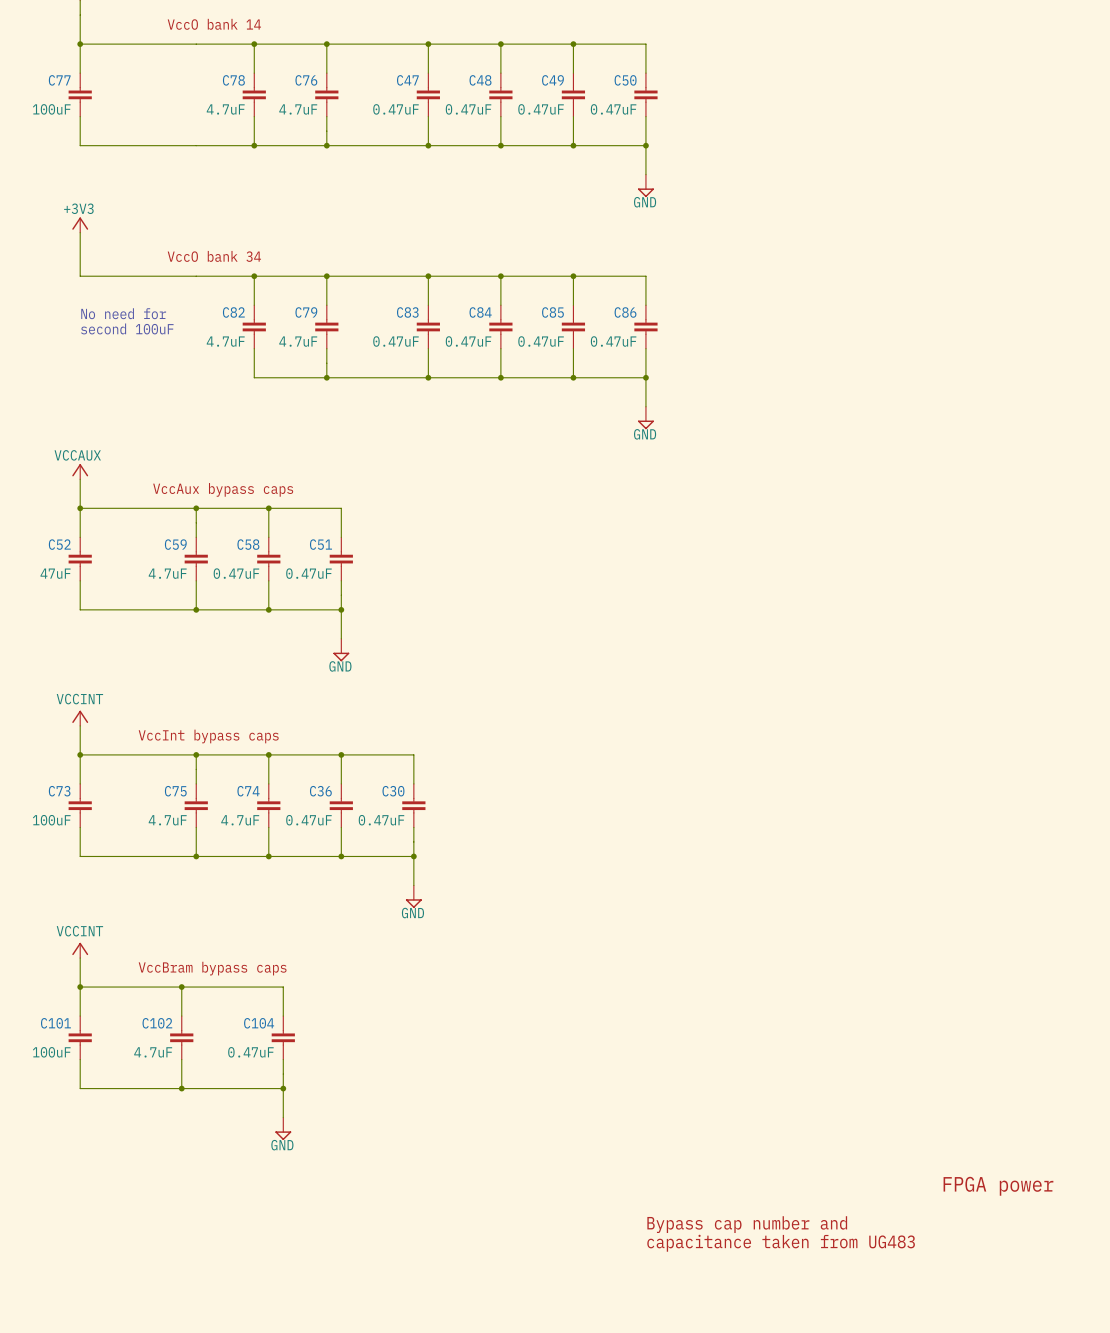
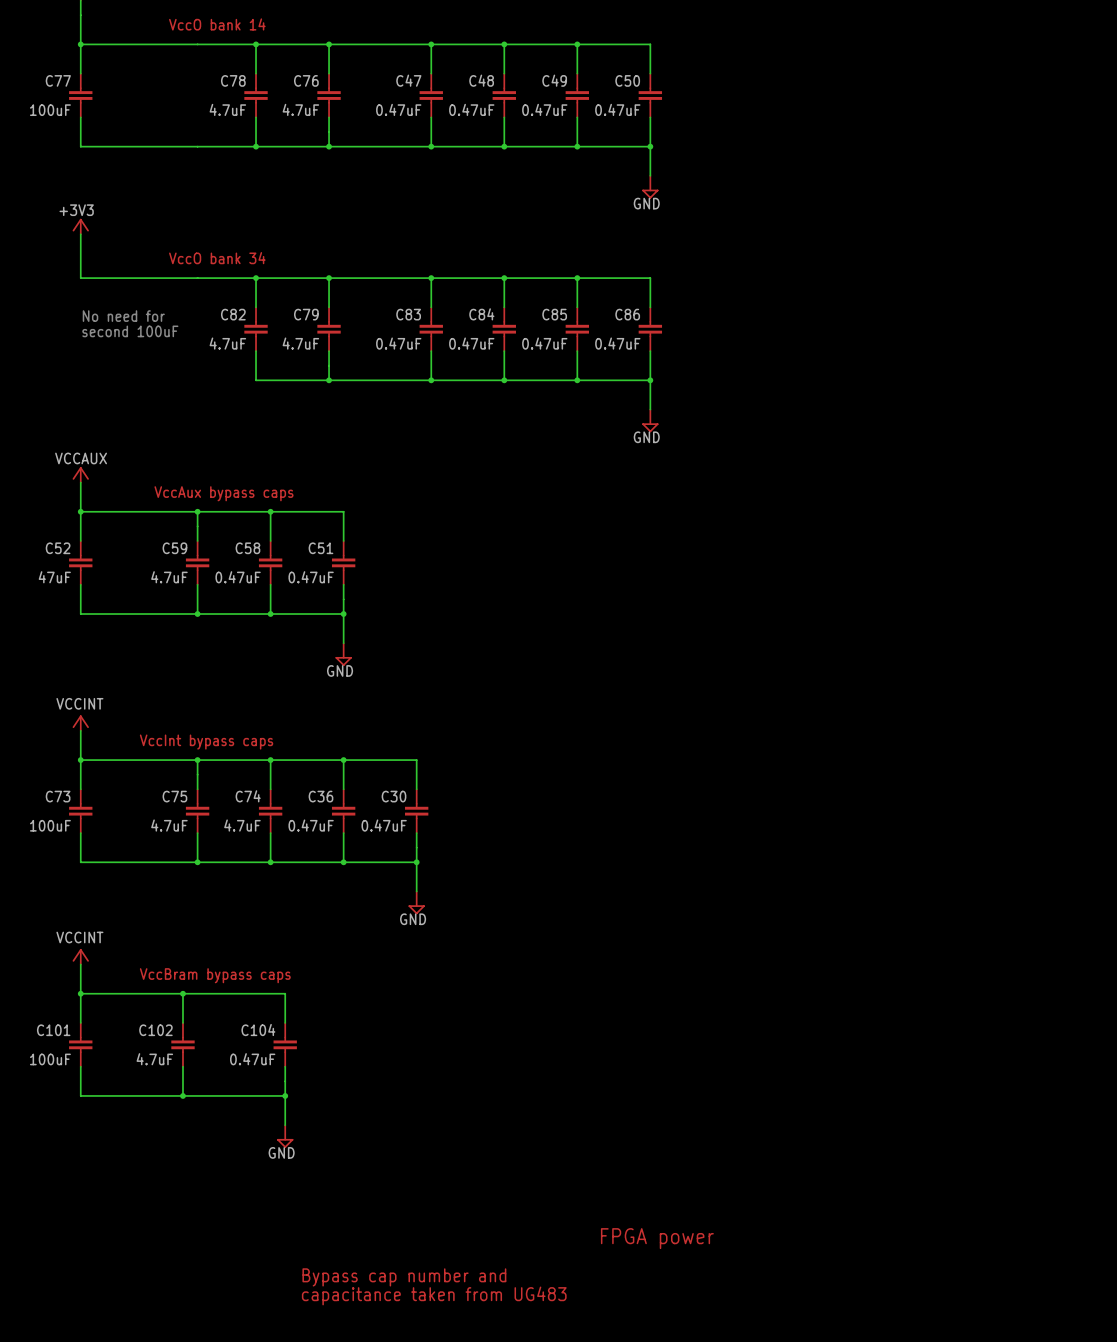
text: FPGA power (998, 1186) -> none
text: Bypass cap number and (747, 1224) -> none
text: none -> FPGA power (657, 1238)
text: capacitance taken from UG483 (781, 1243) -> none
text: none -> Bypass cap number and (404, 1277)
text: none -> capacitance taken from UG483 (434, 1295)

